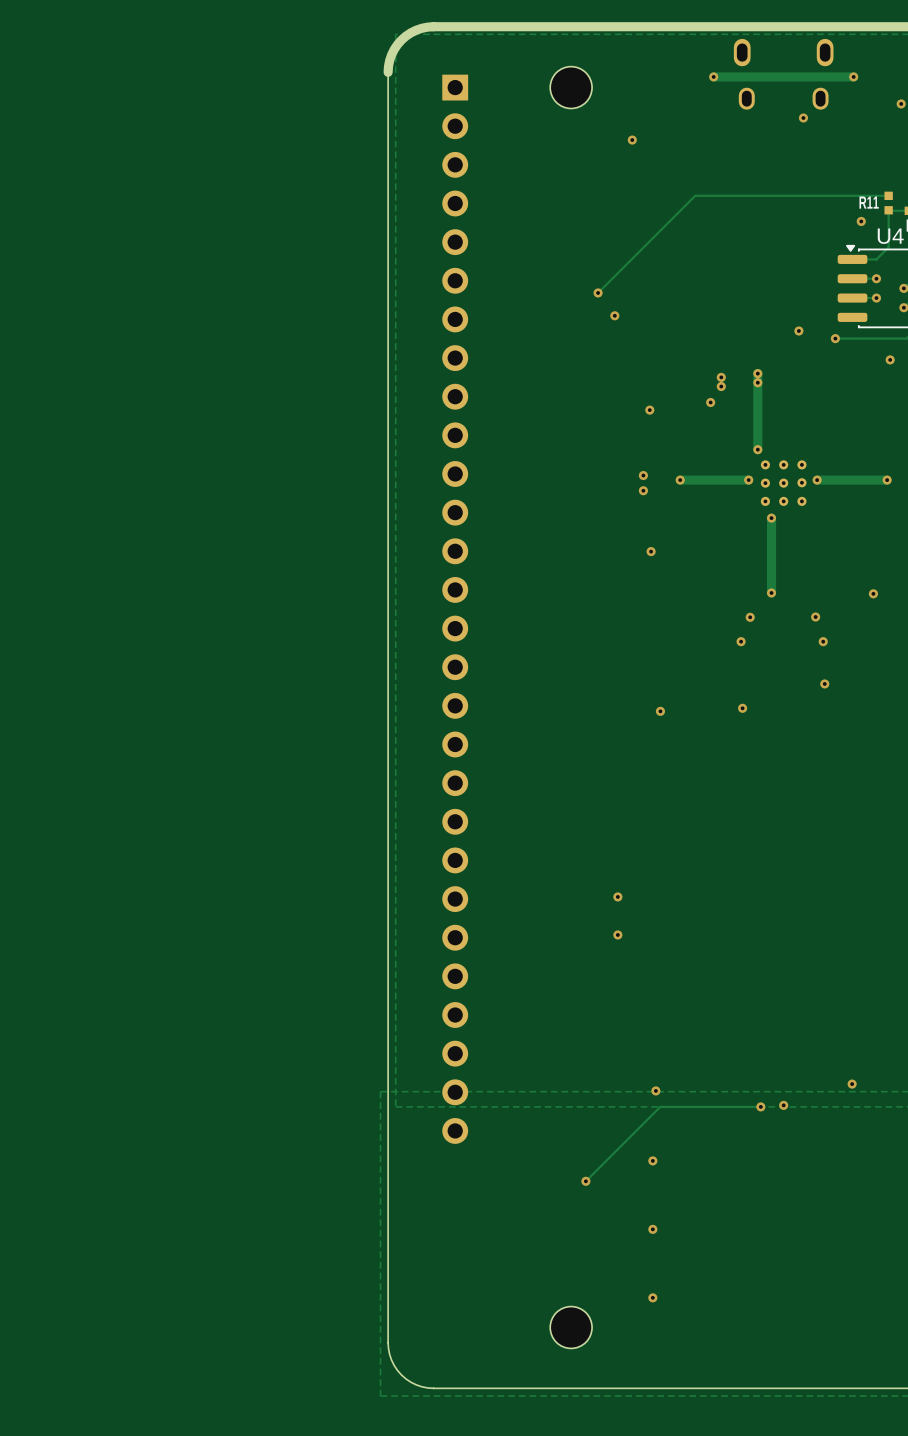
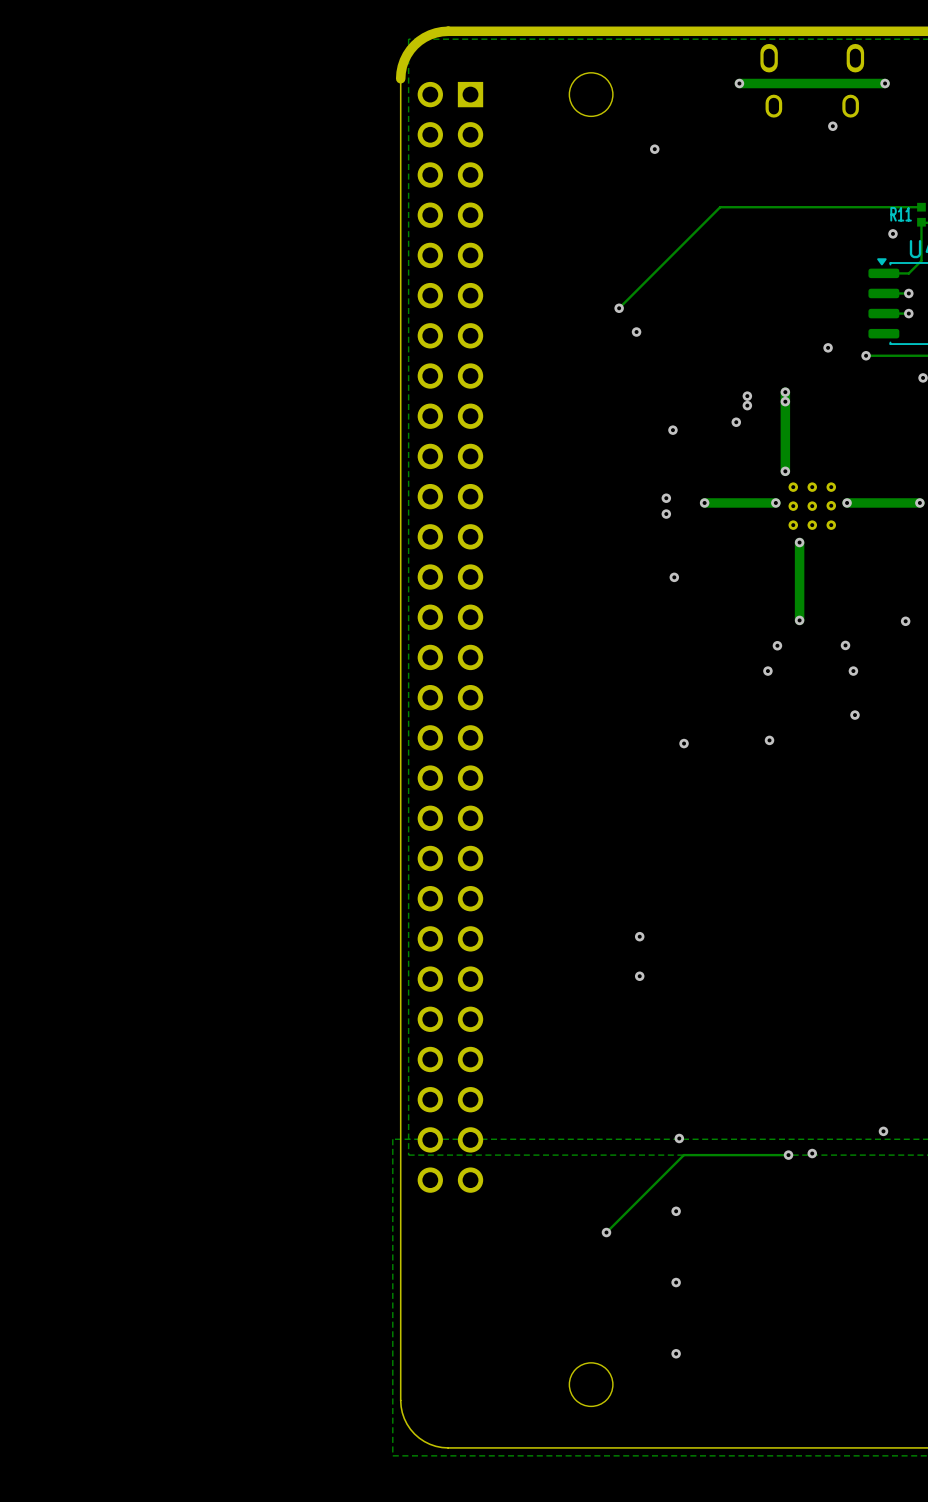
part: none -> (450, 597)
part: (455, 609) -> none
part: none -> (450, 1160)

